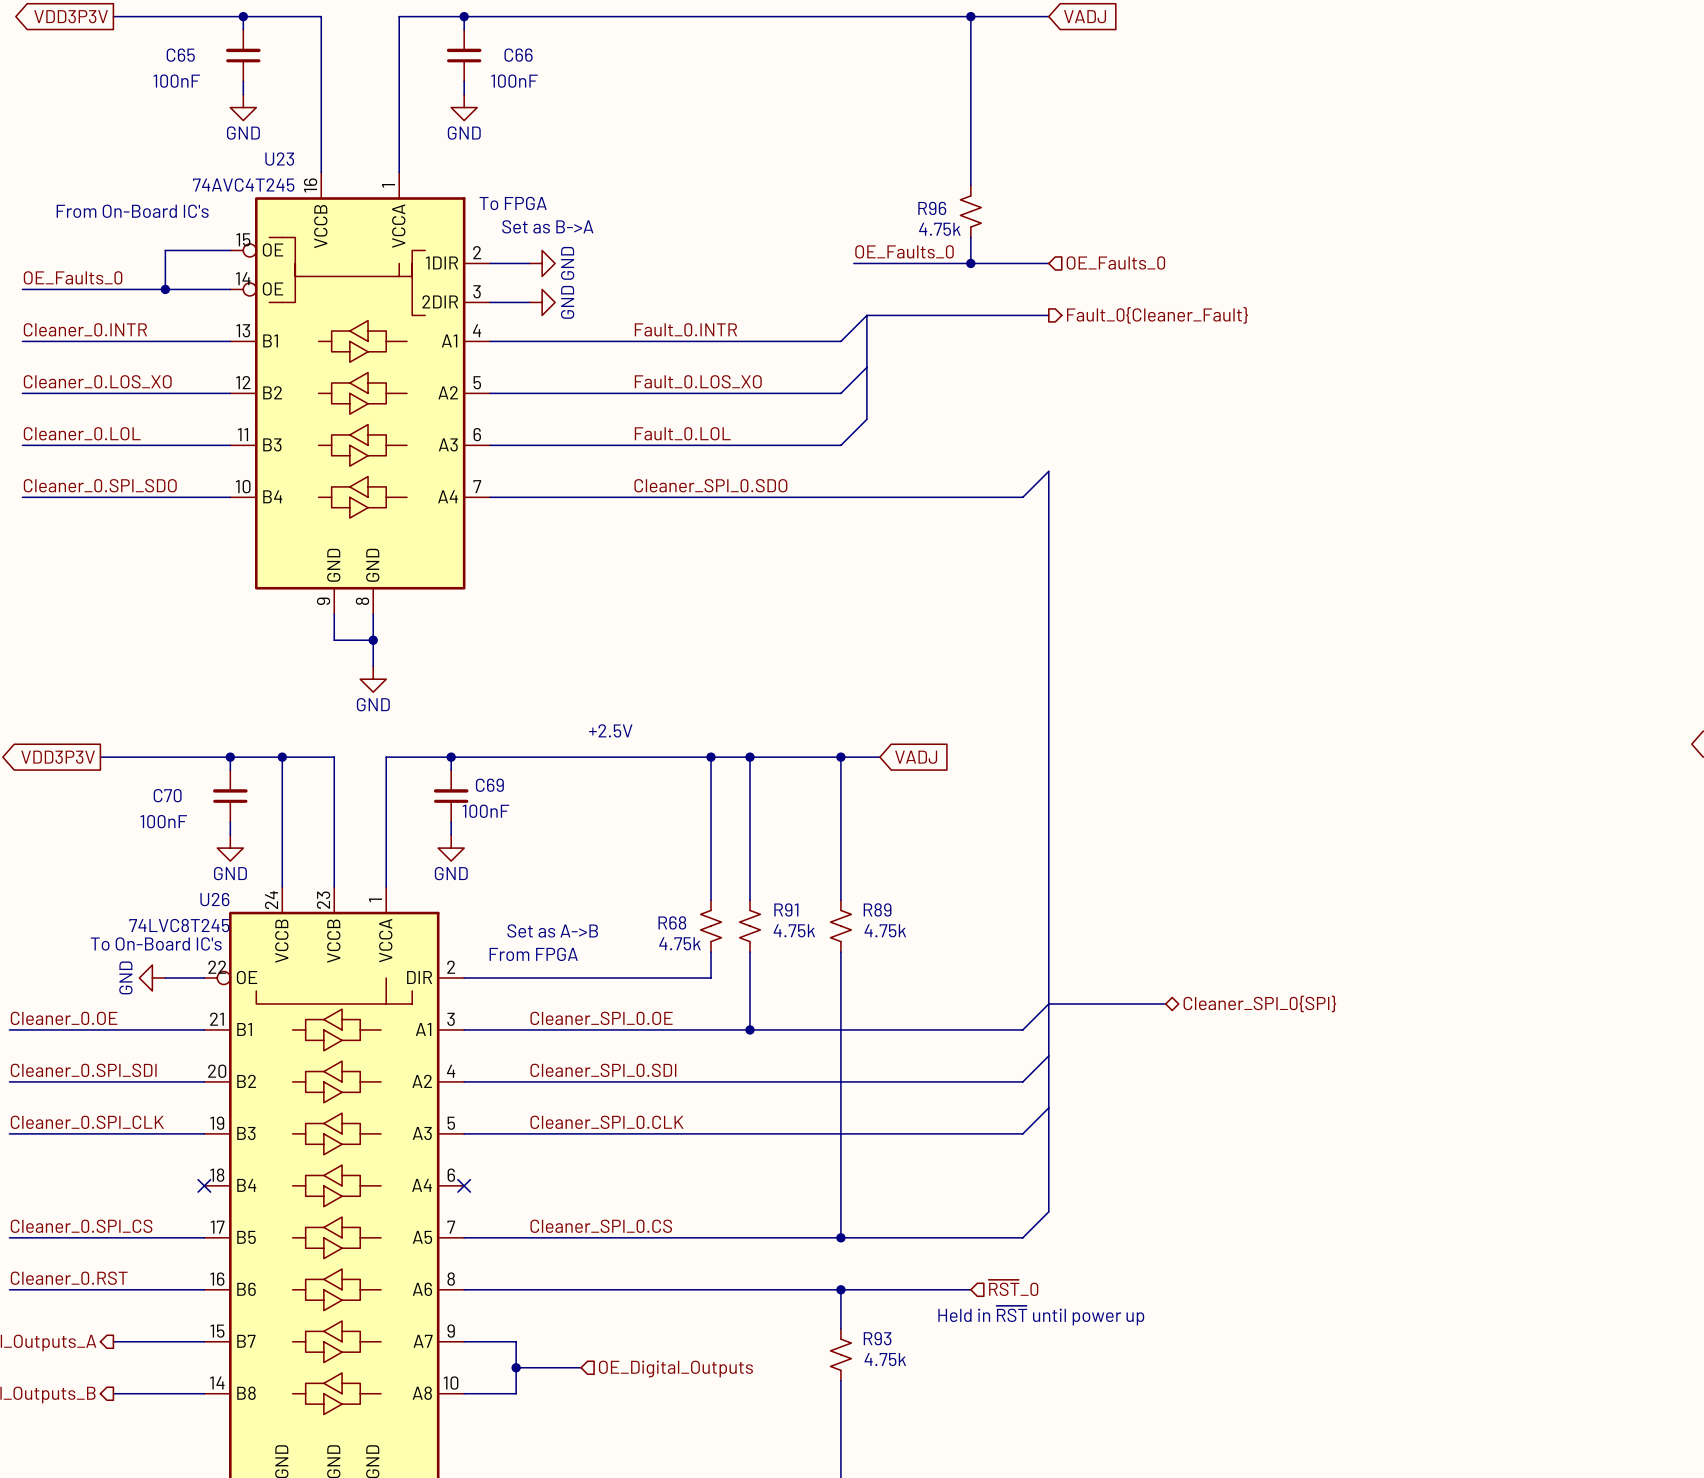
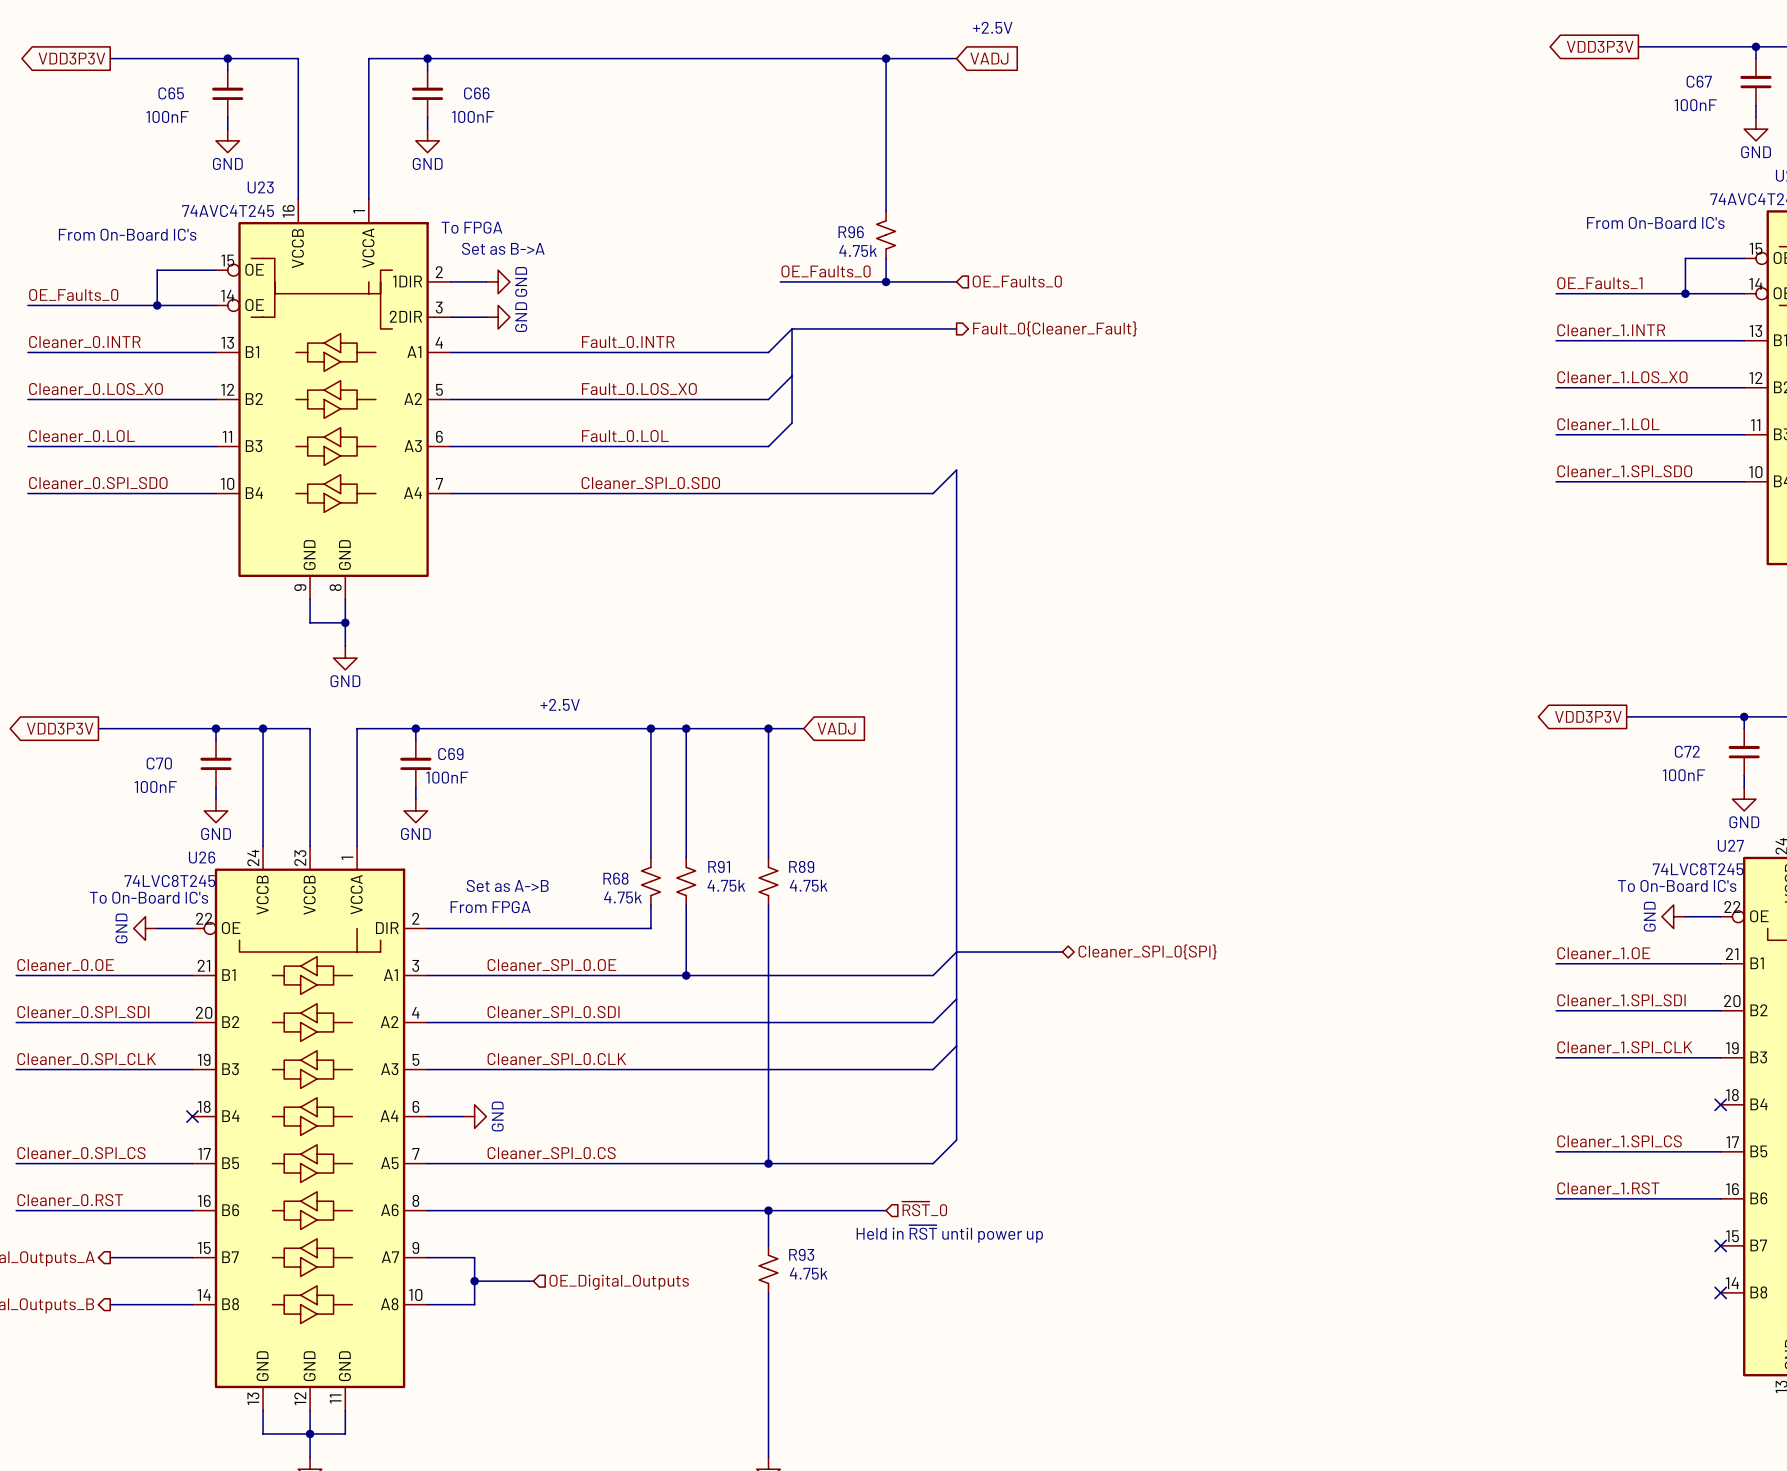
wire: none -> (427, 1116) (462, 1116)
no-connect mark: (464, 1185) -> none
power symbol: none -> GND (474, 1116)

